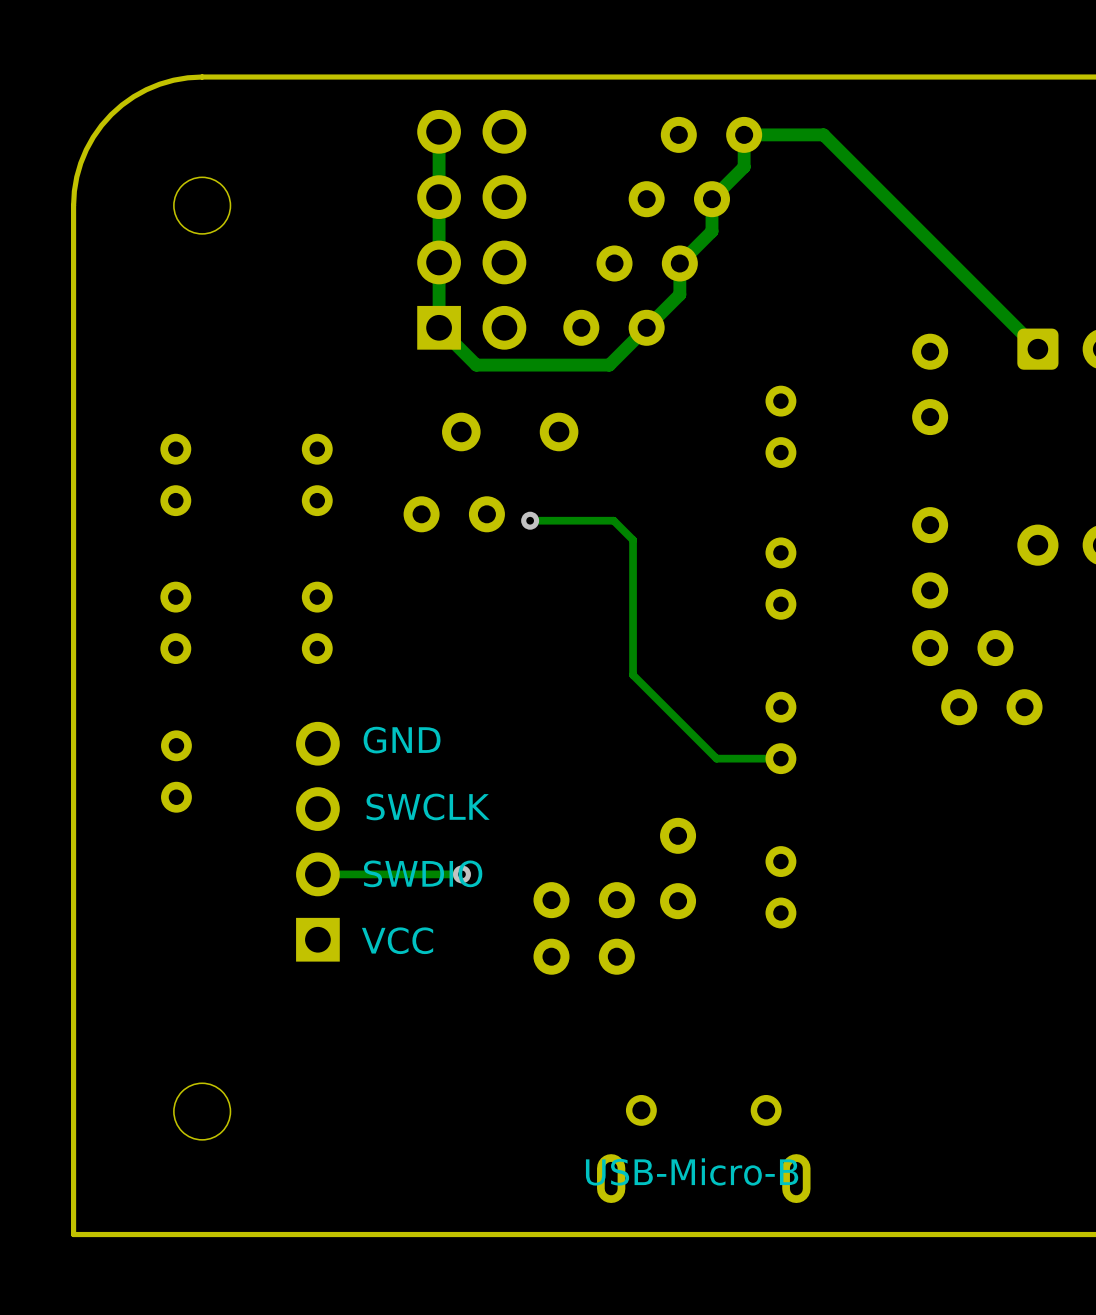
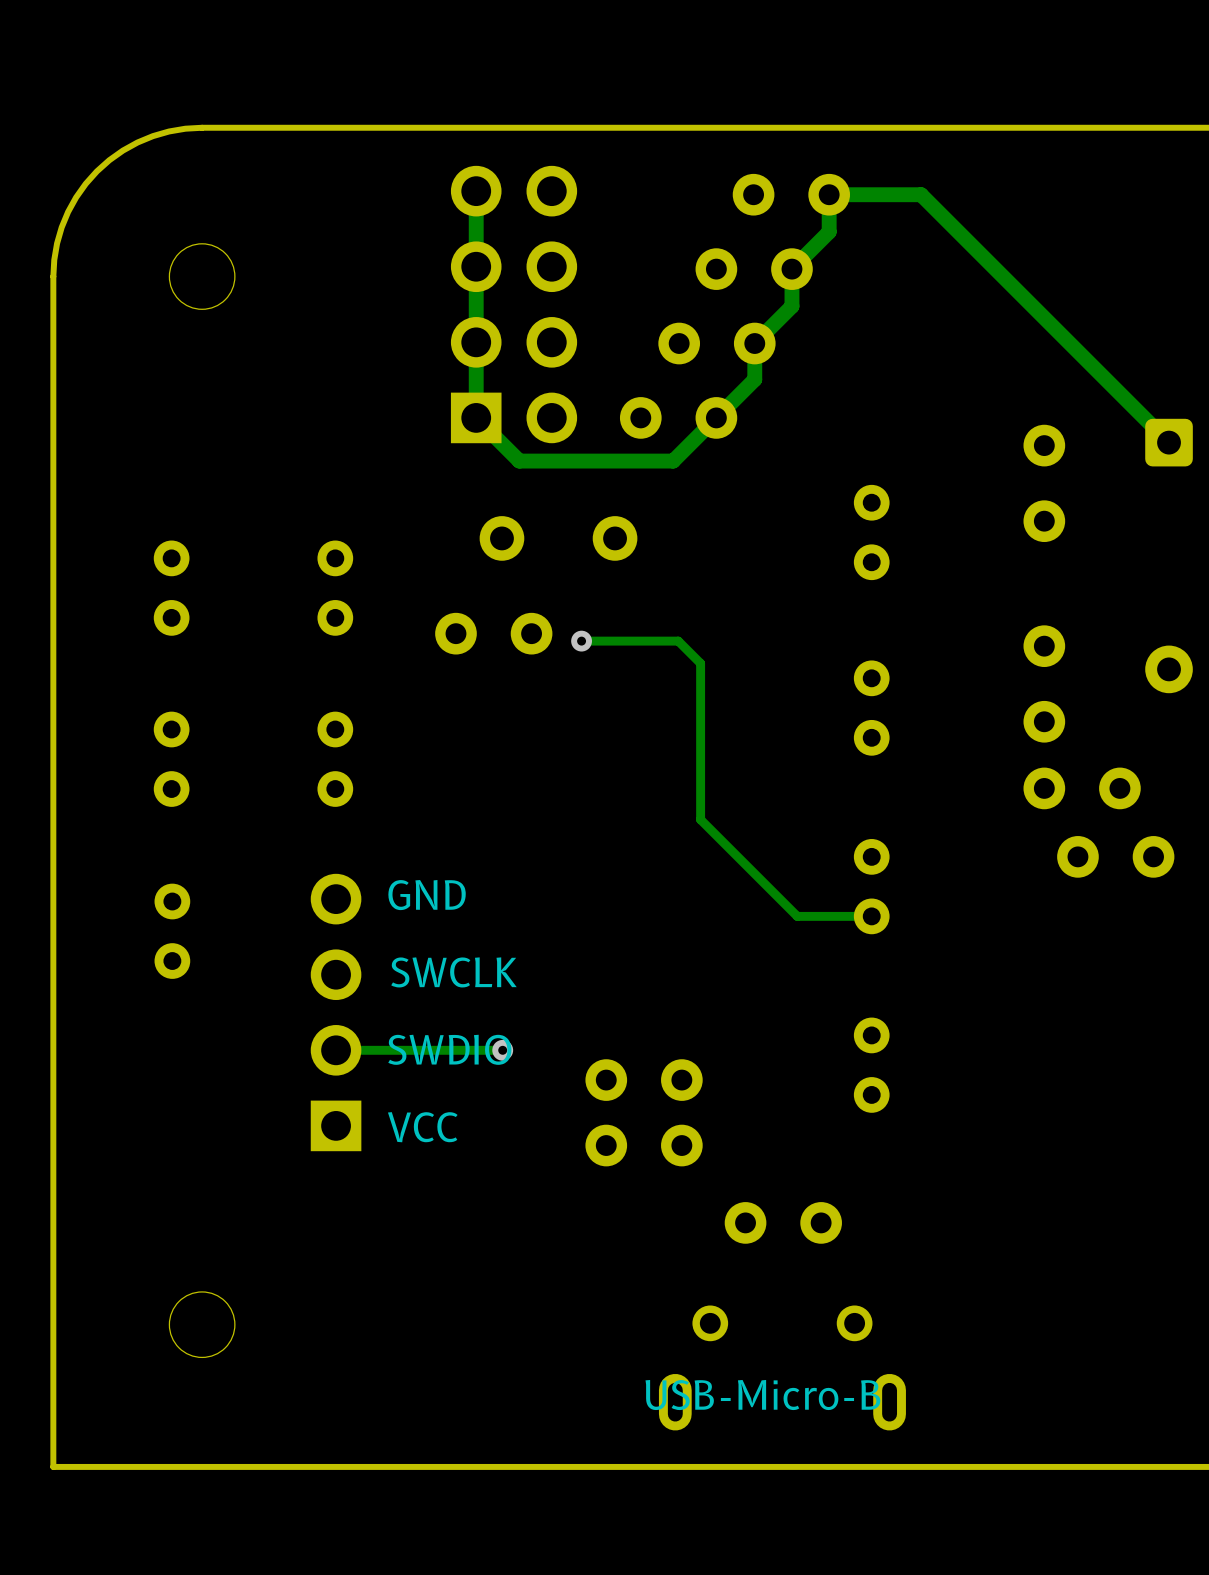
part rotation: 0° (678, 868) -> 90° clockwise (783, 1222)
part position: (678, 868) -> (783, 1222)

